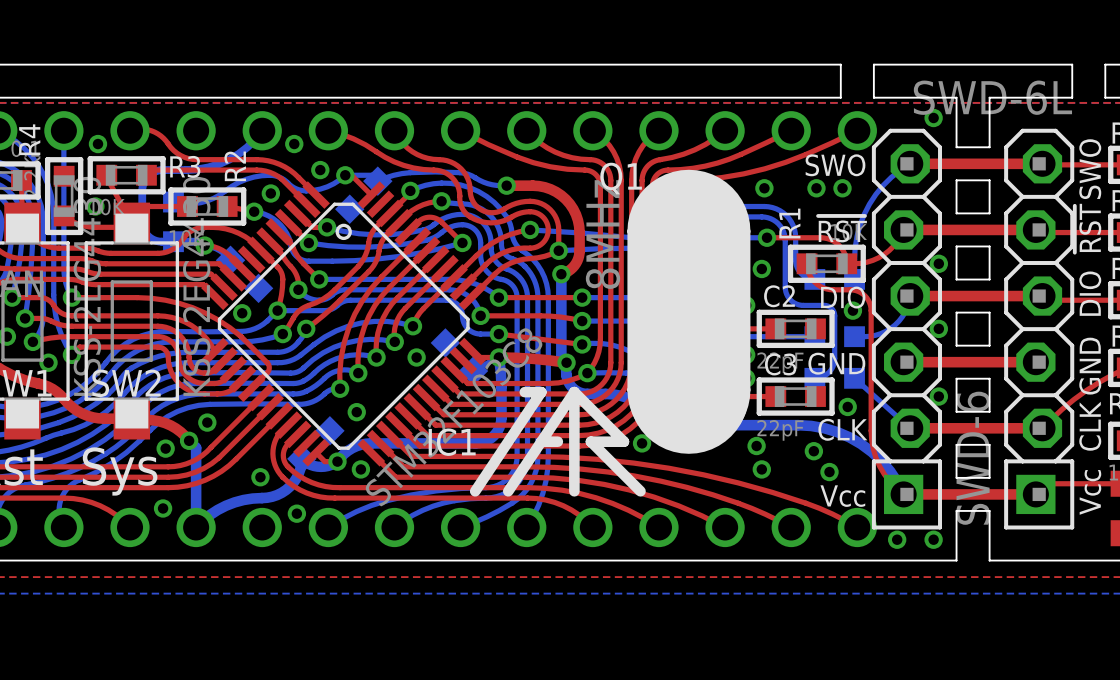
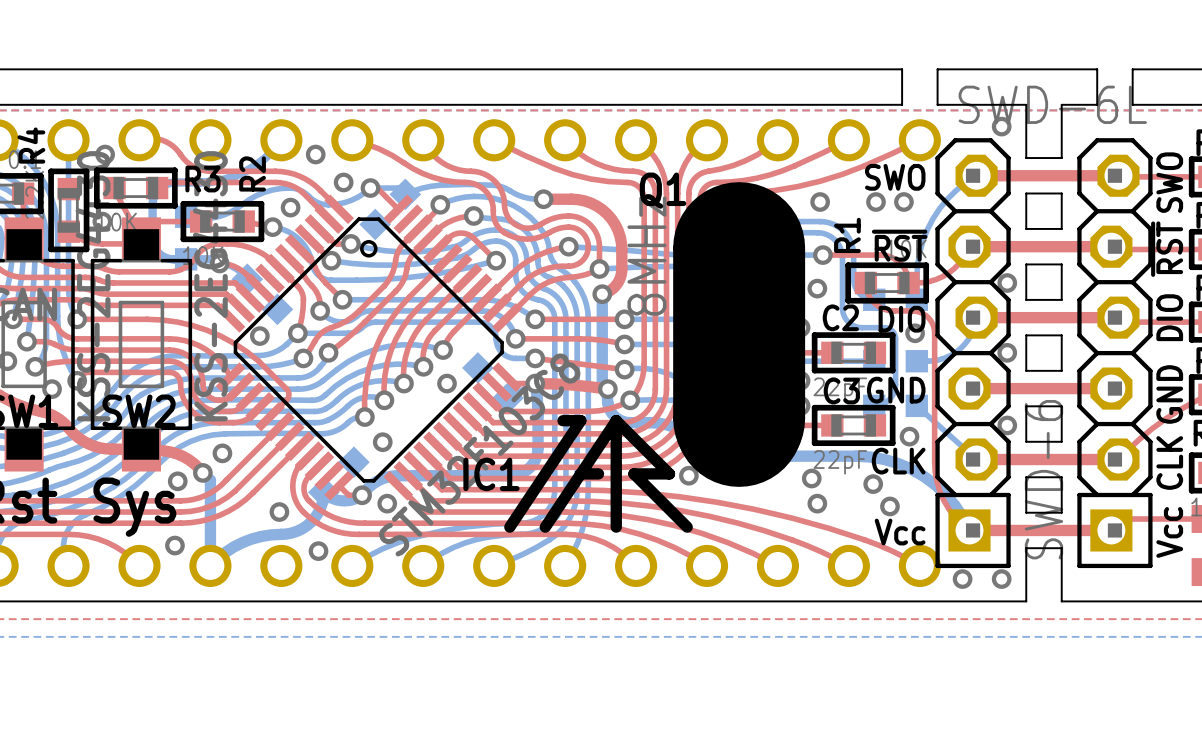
board edge: (1022, 64) (1055, 64) -> (1097, 69) (1097, 104)
board edge: (1072, 64) (1072, 97) -> (1150, 69) (1185, 69)
board edge: (1105, 64) (1105, 97) -> (1150, 104) (1185, 104)
board edge: (1022, 97) (1055, 97) -> (1132, 69) (1132, 104)

